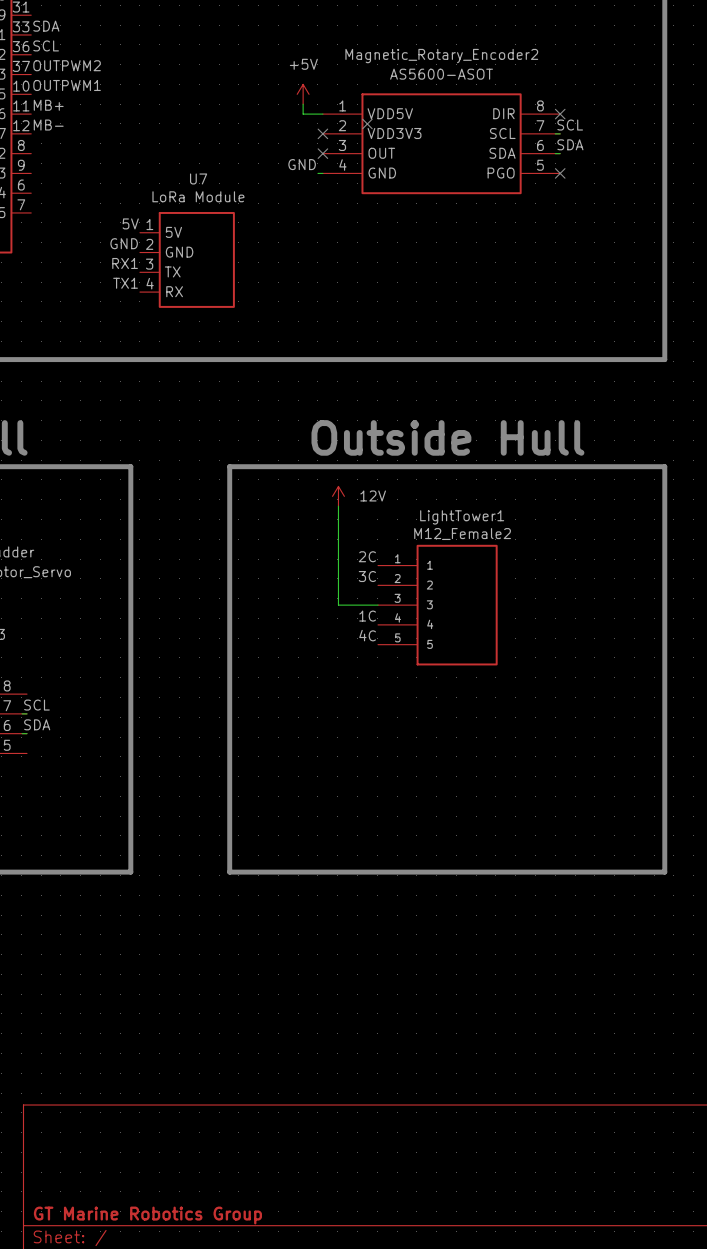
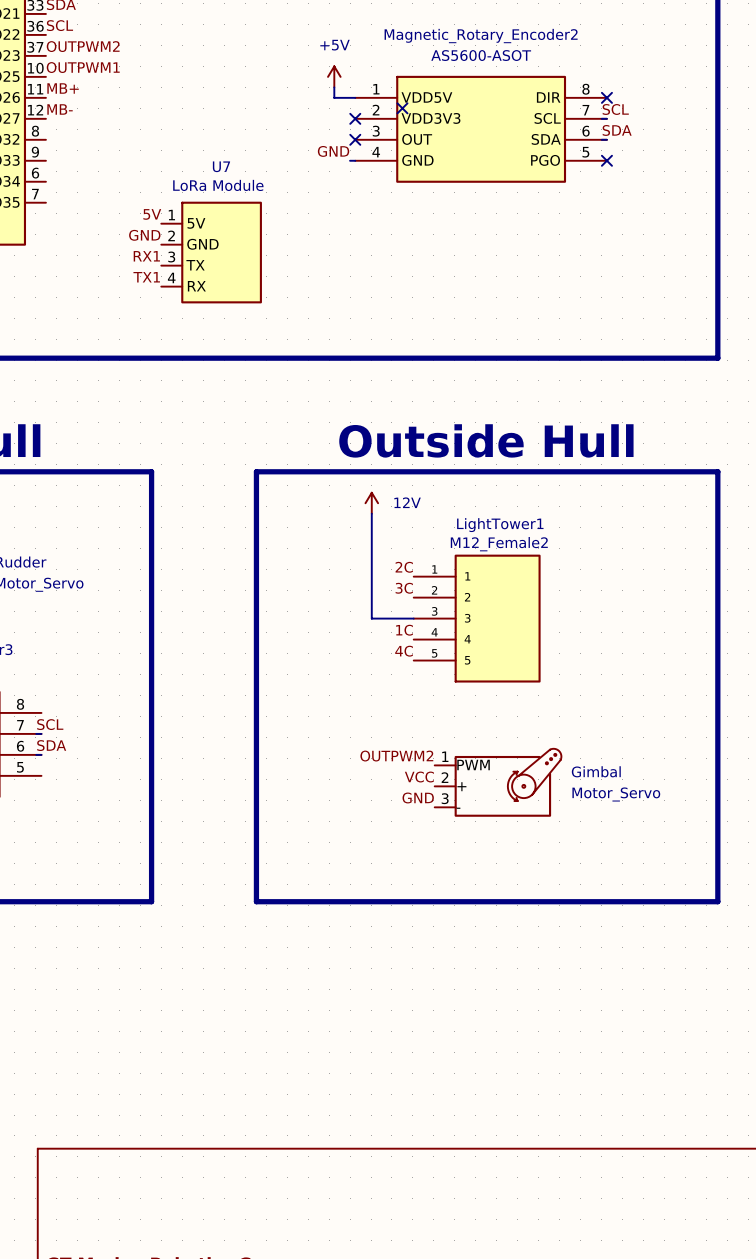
label: none -> OUTPWM2 (396, 756)
label: none -> VCC (419, 777)
Gimbal: none -> Motor_Servo (498, 782)
label: none -> GND (418, 797)

